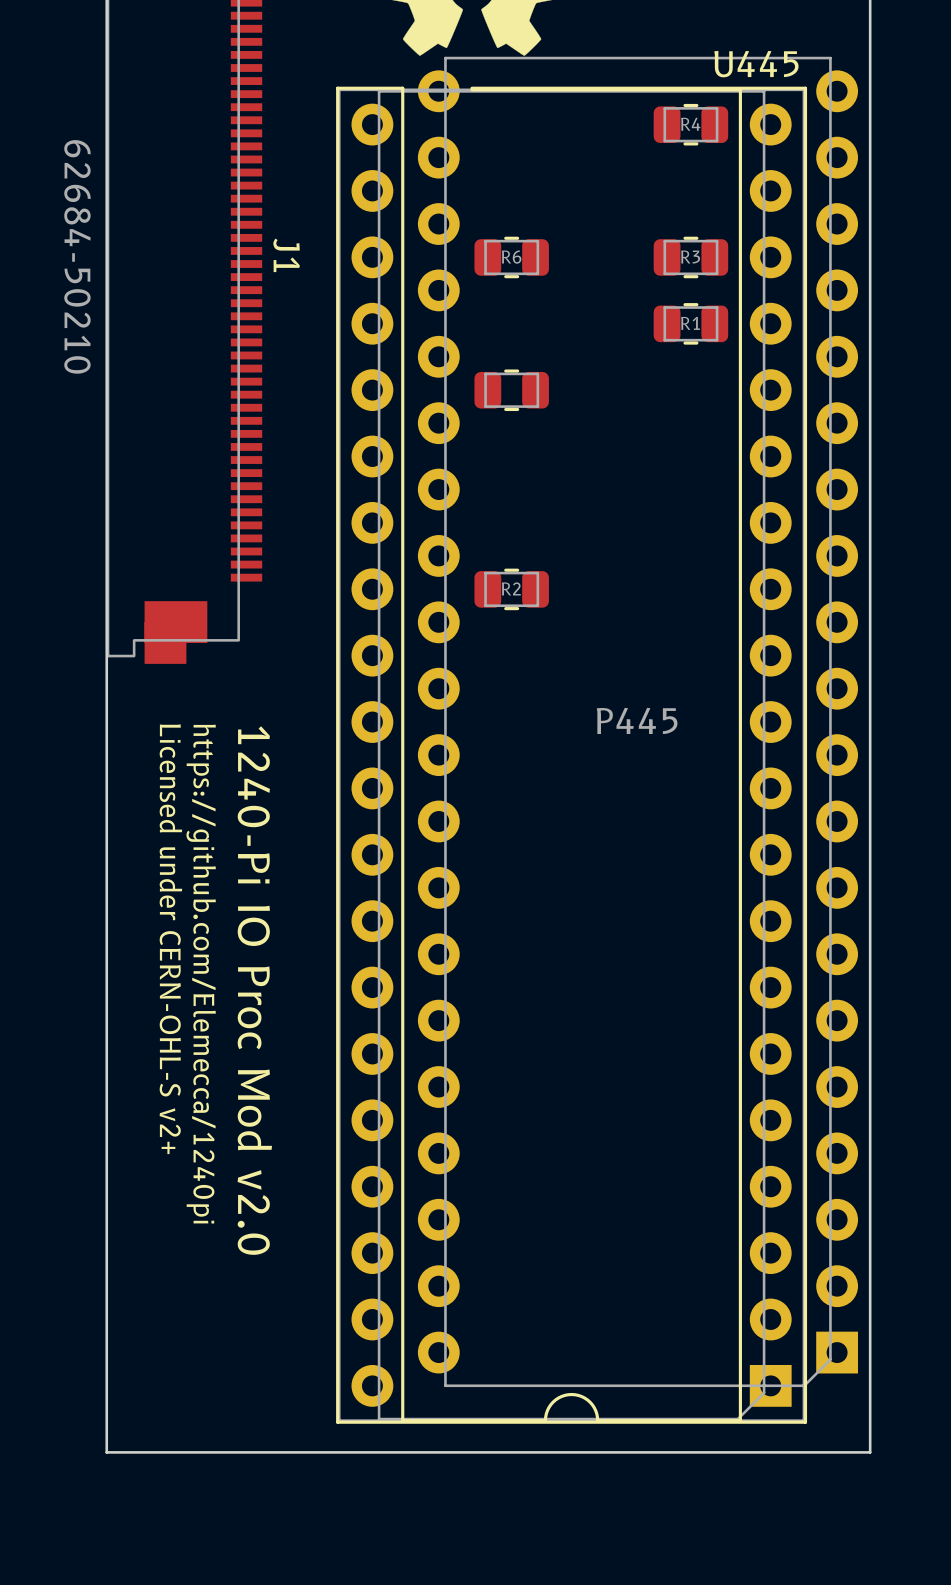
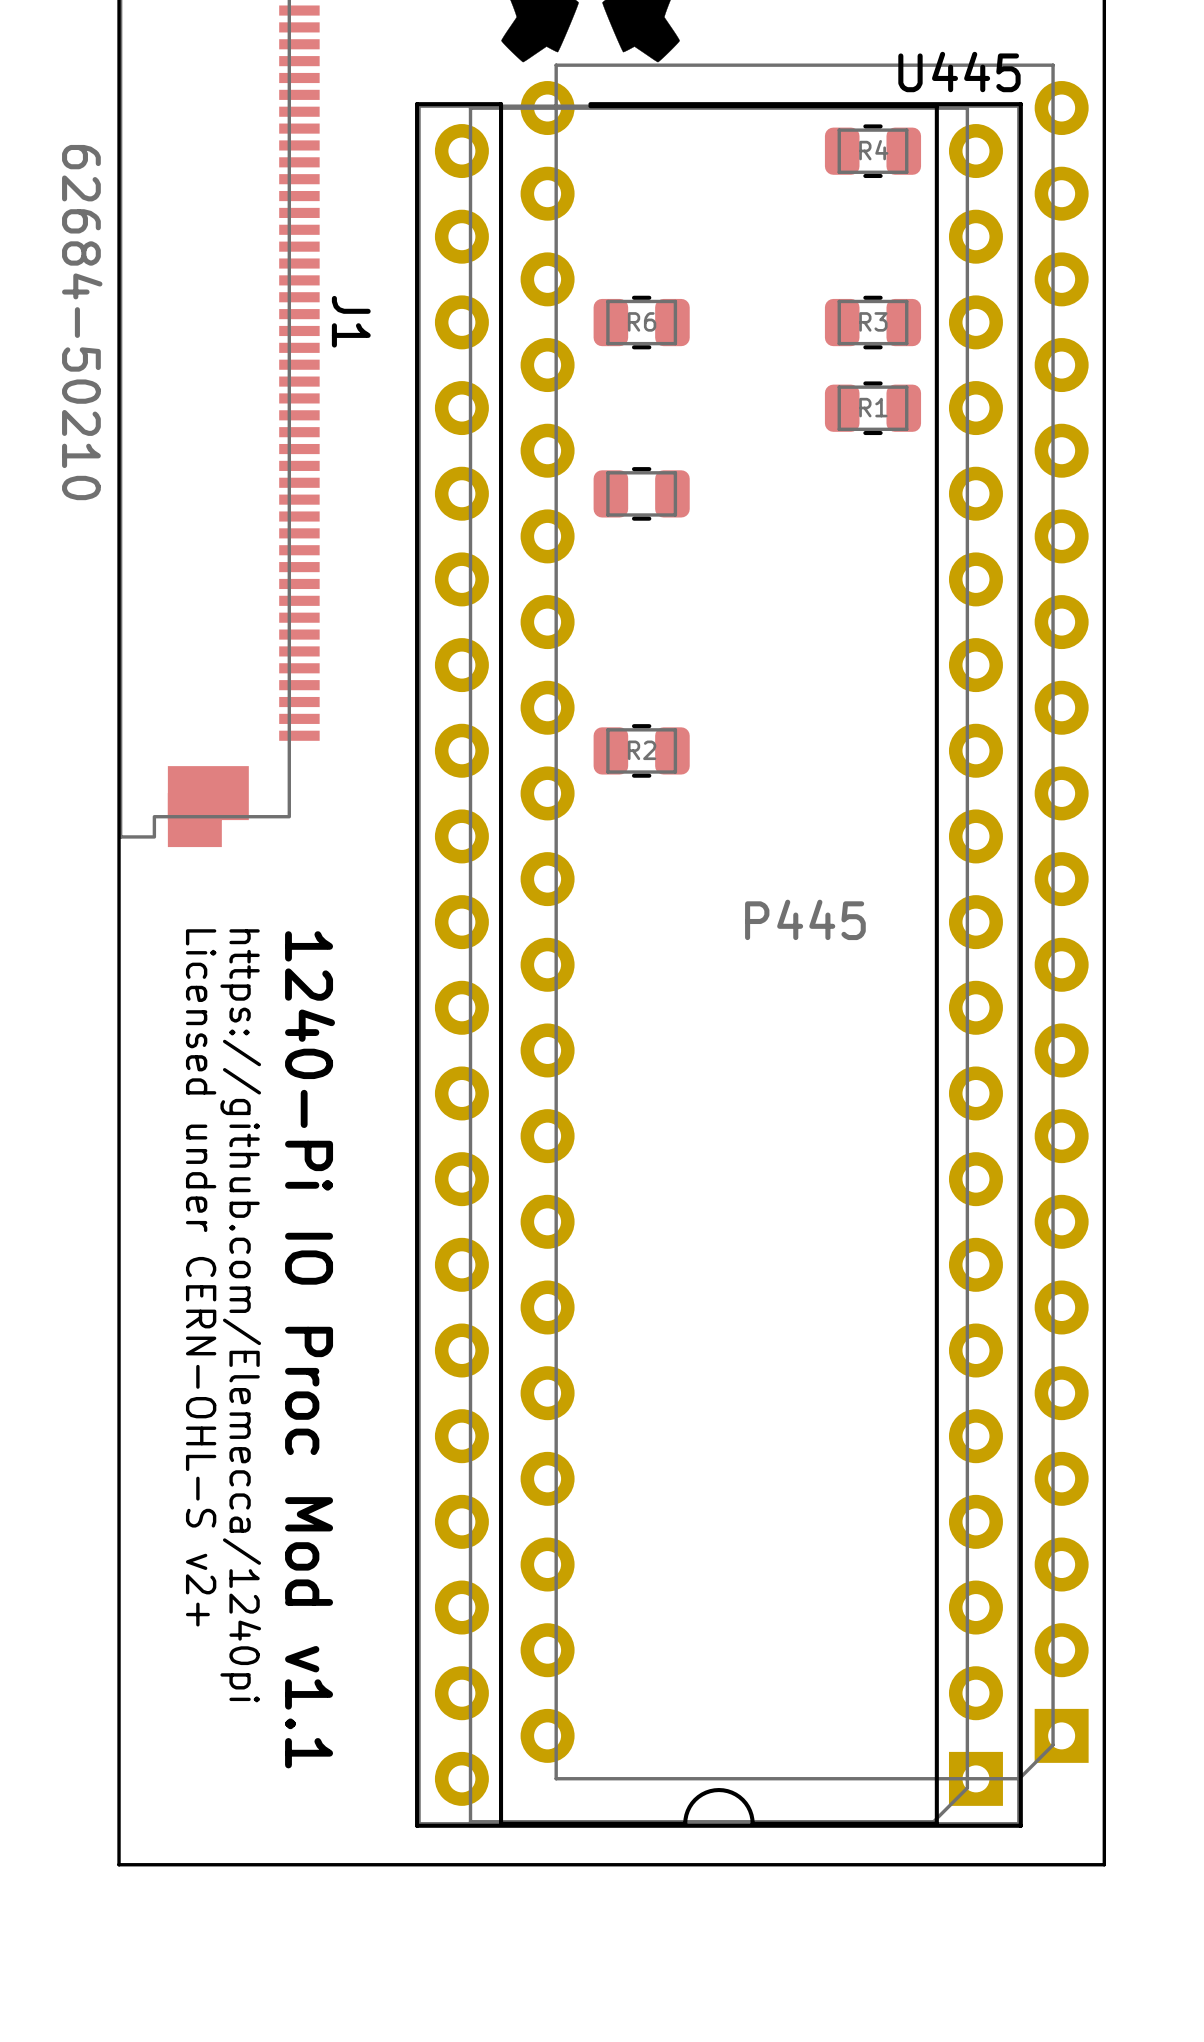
text: 1240-Pi IO Proc Mod v2.0 (254, 990) -> 1240-Pi IO Proc Mod v1.1 (310, 1349)

